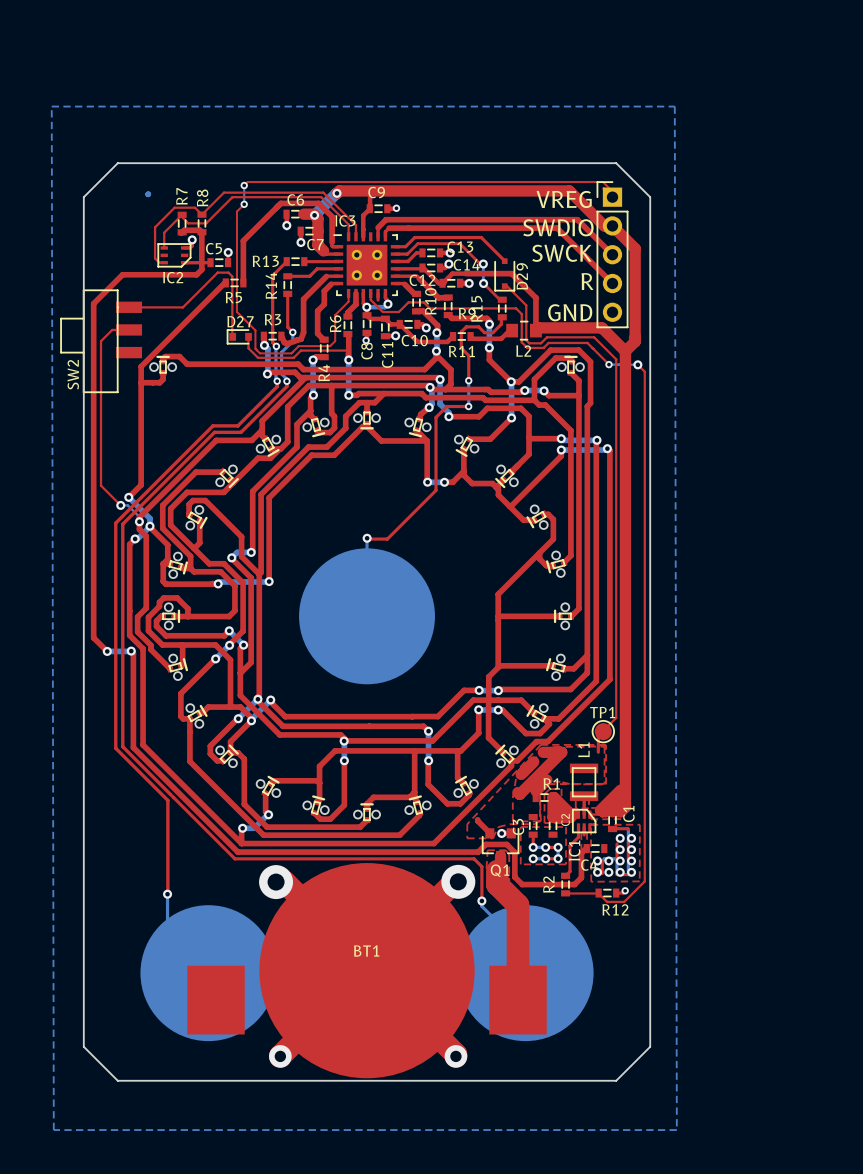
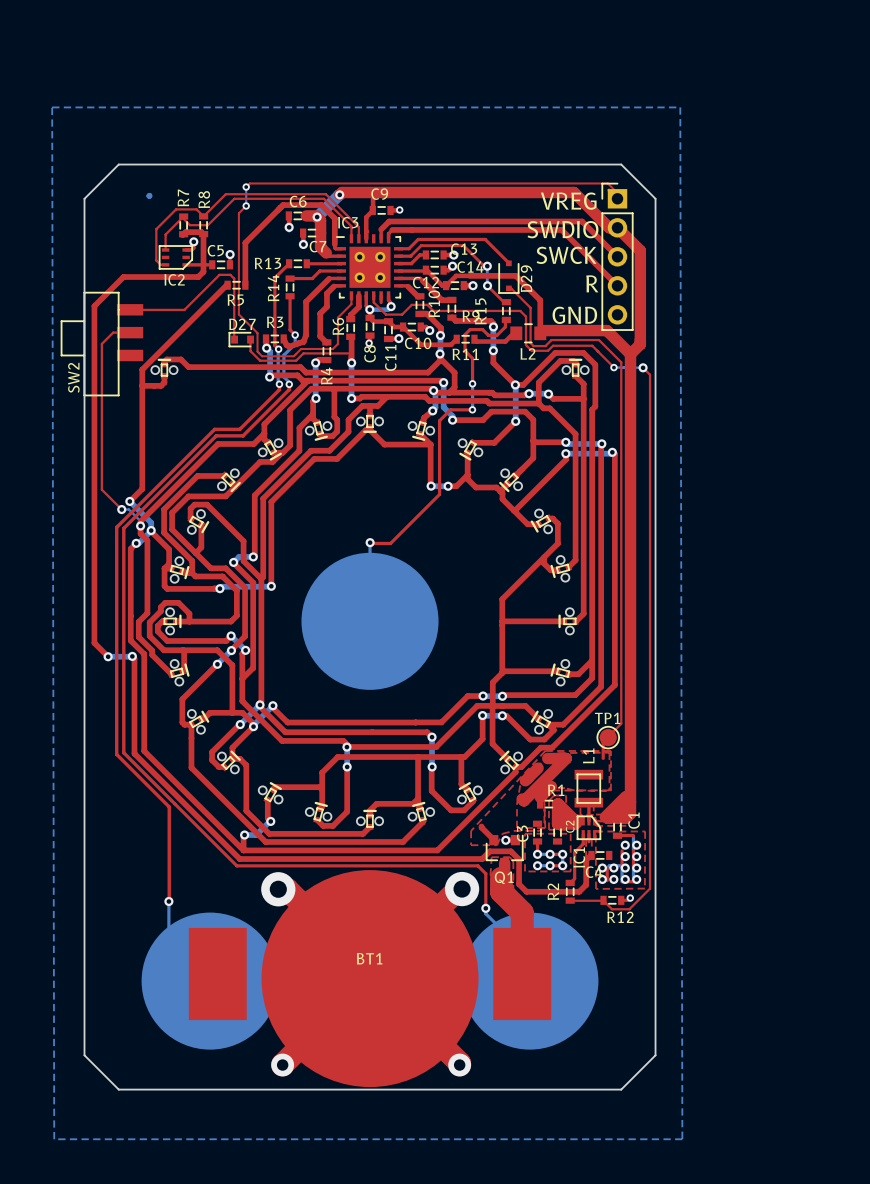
BT1 footprint: [187, 863, 547, 1079] -> [188, 870, 552, 1088]

